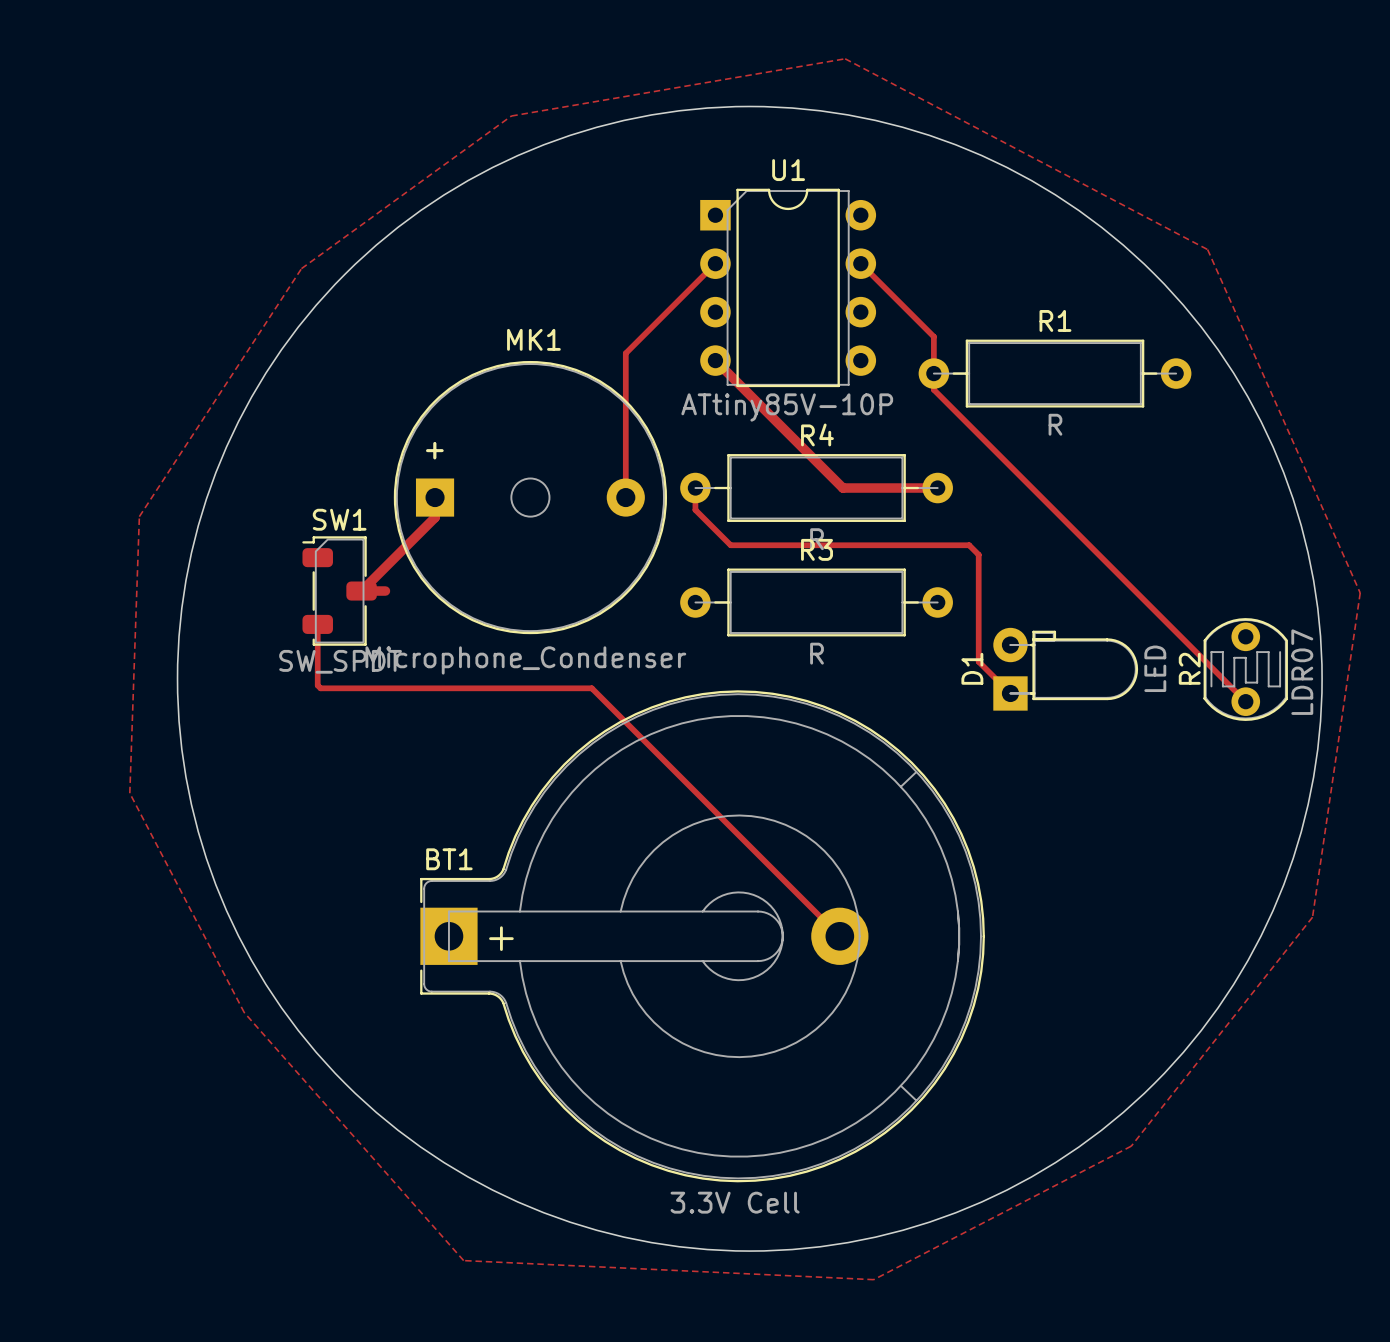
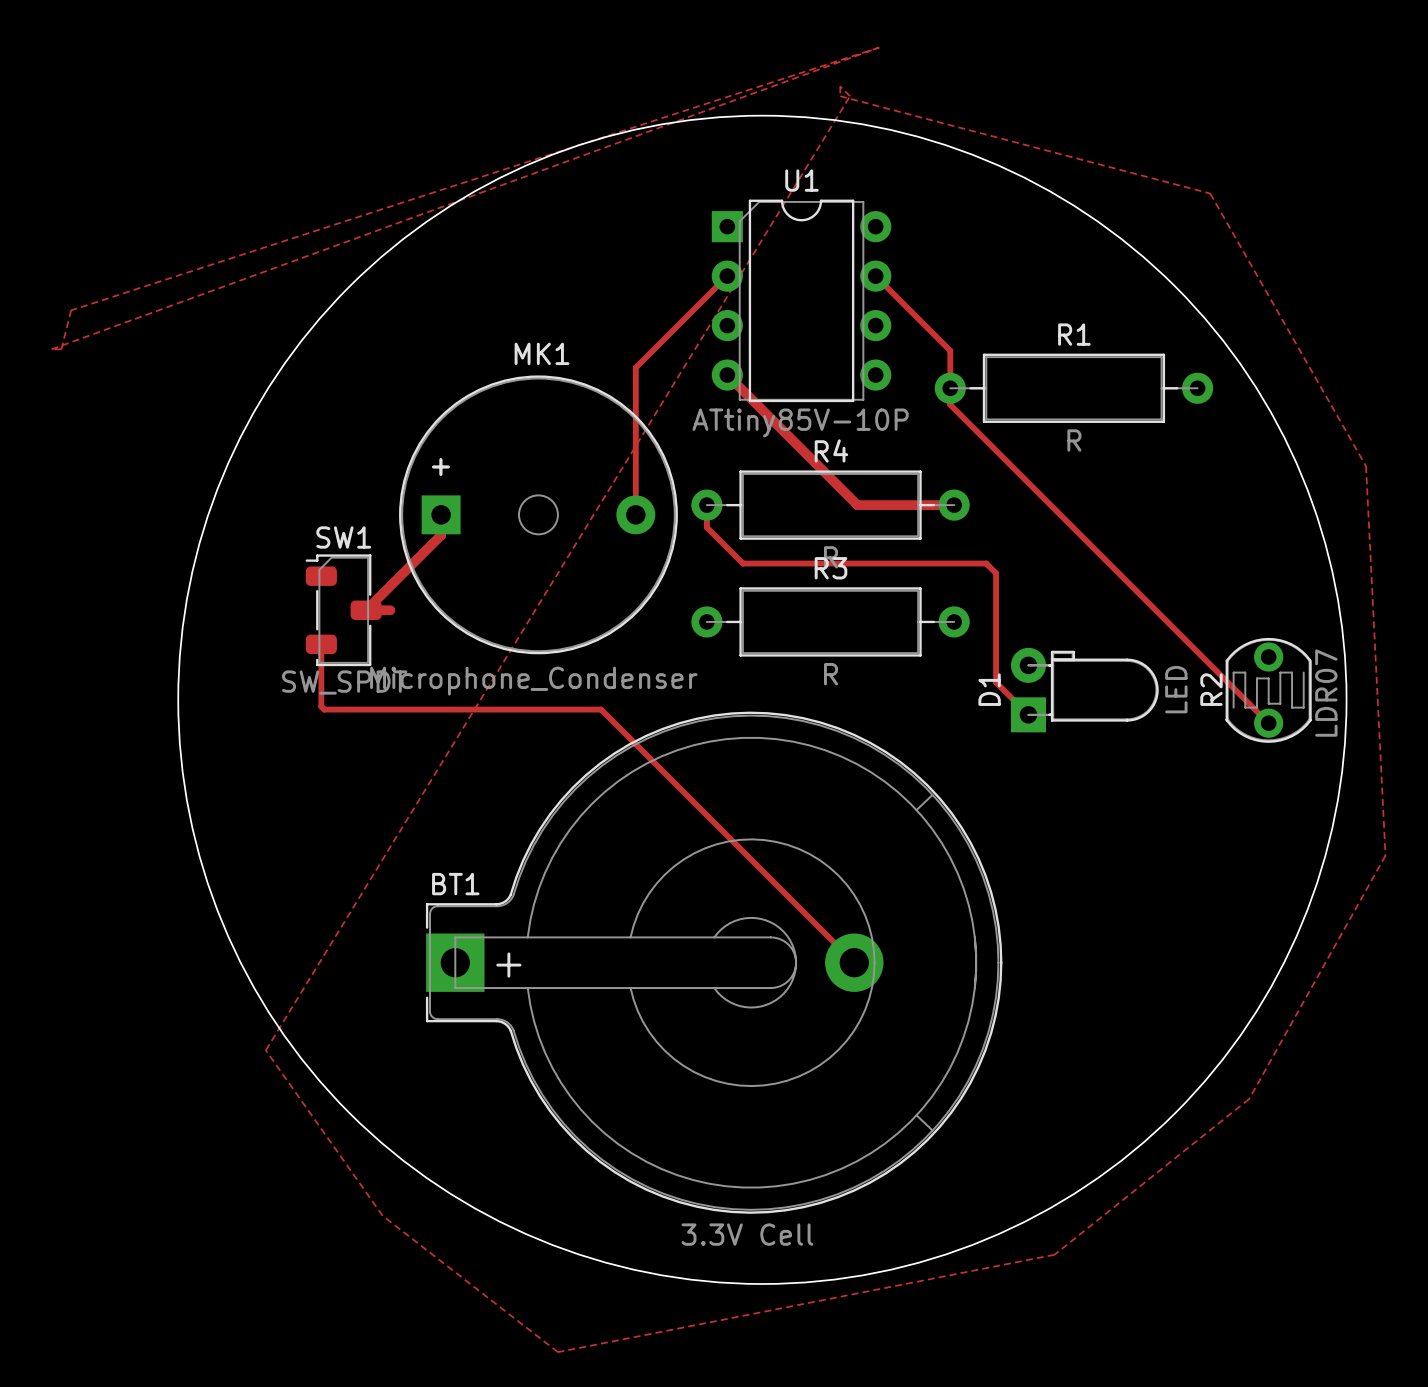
zone outline: none -> (879, 47) (51, 349) (61, 349) (71, 310) (879, 47)
zone outline: (845, 58) (511, 116) (301, 268) (139, 516) (129, 793) (244, 1012) (463, 1260) (873, 1279) (1131, 1146) (1312, 917) (1360, 592) (1207, 249) (845, 58) -> (840, 86) (840, 96) (1210, 193) (1366, 466) (1385, 855) (1249, 1099) (1054, 1254) (557, 1352) (382, 1215) (265, 1050) (850, 96) (840, 86)

